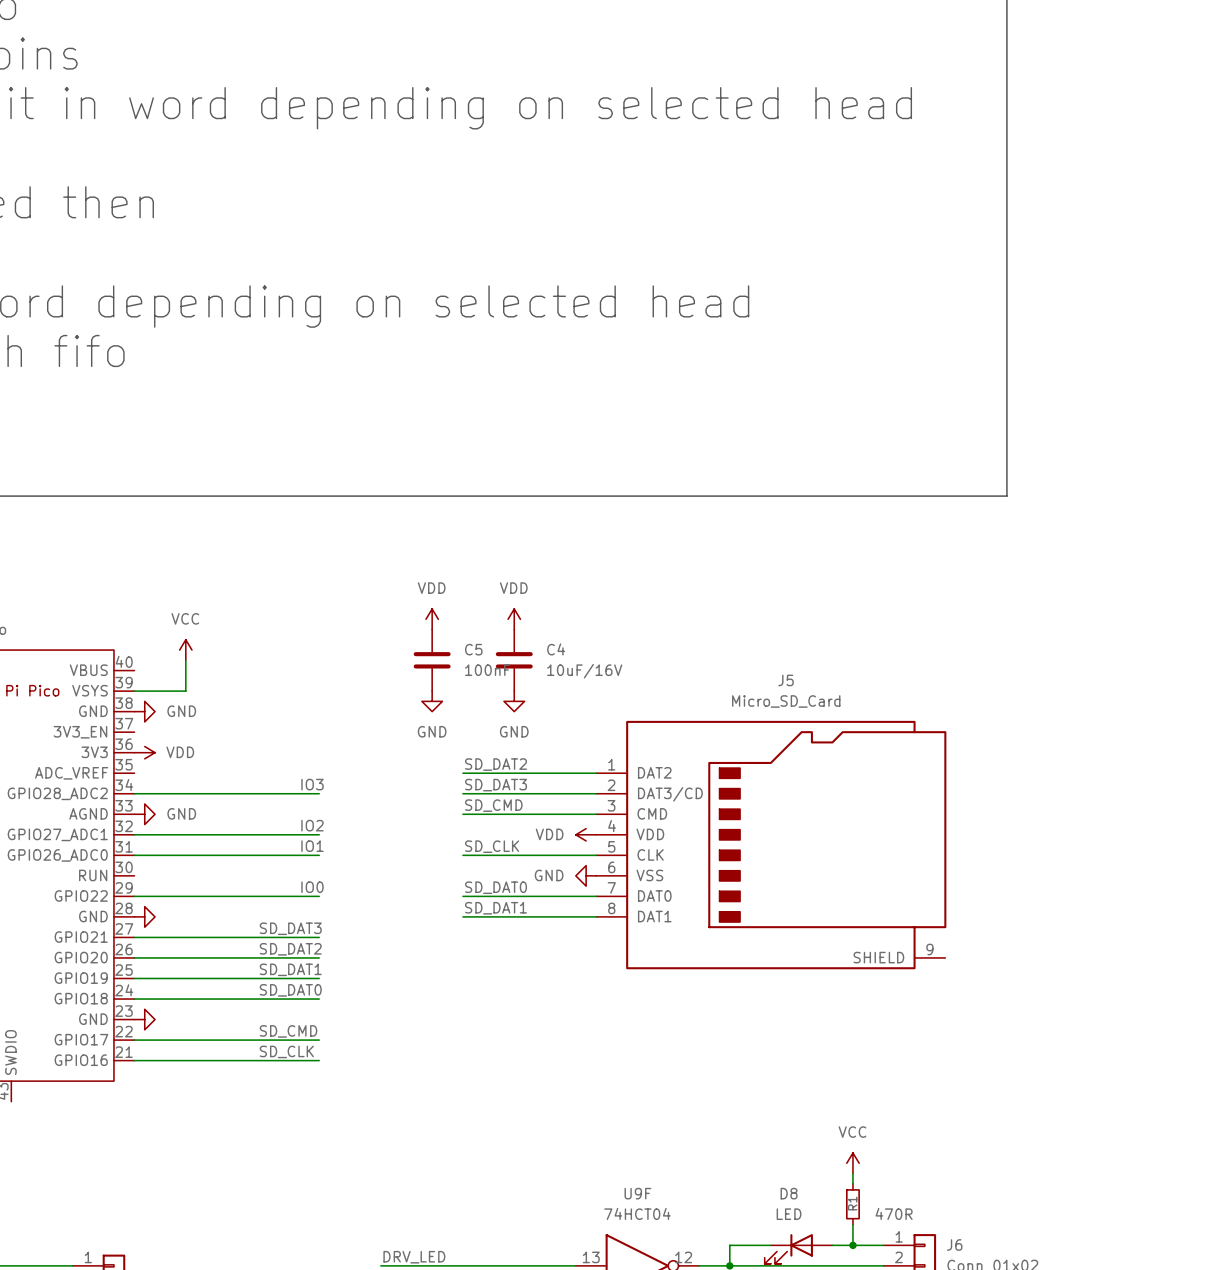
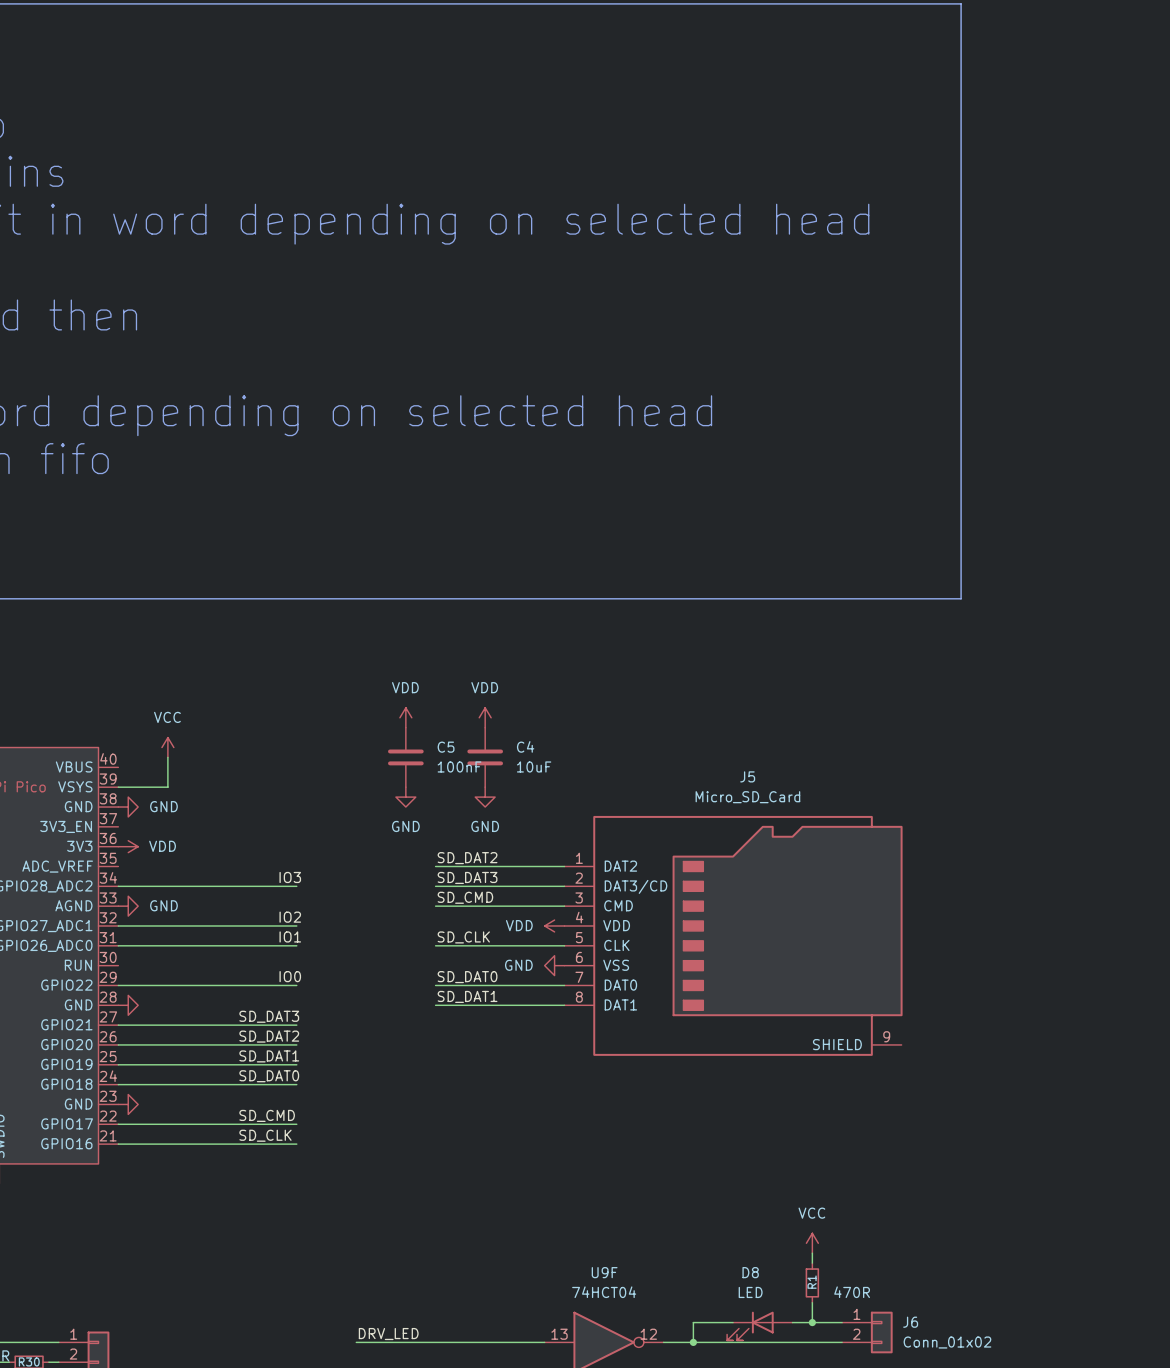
C4 value: 10uF/16V (584, 671) -> 10uF (534, 766)

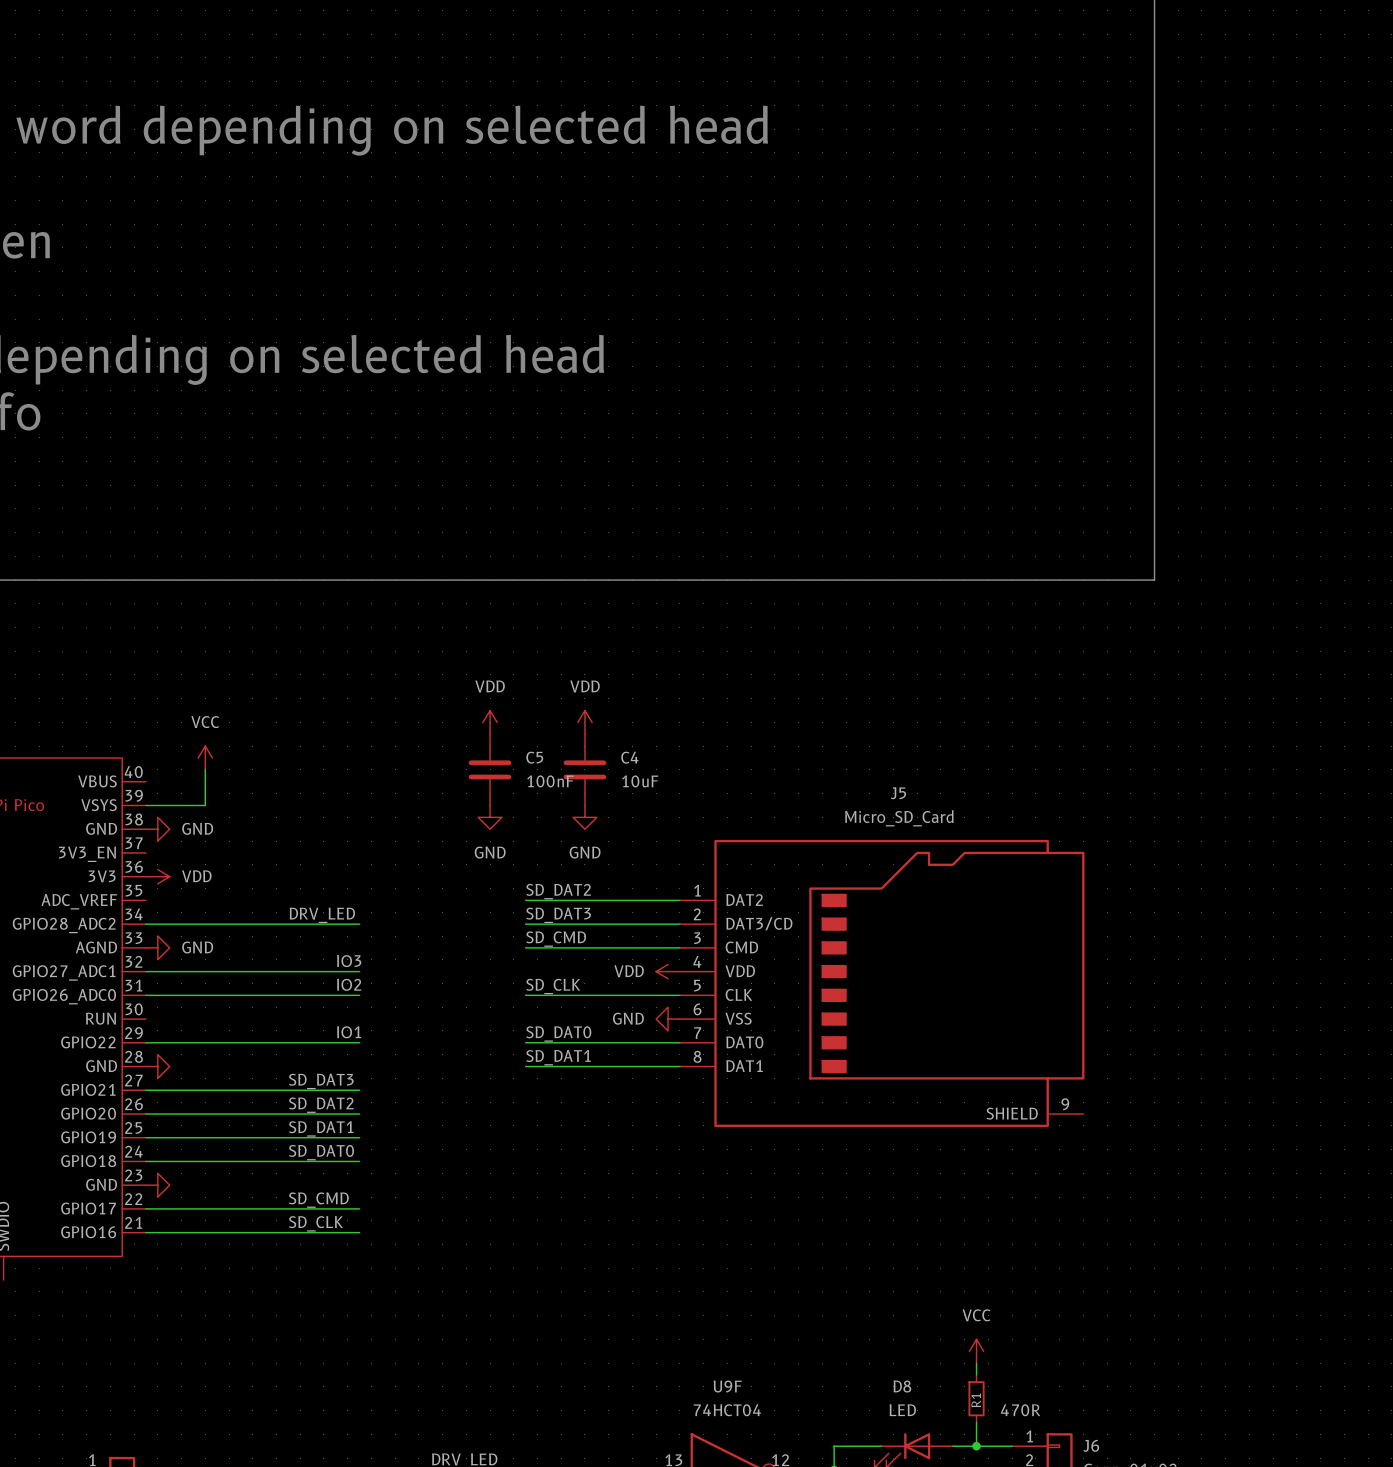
label: none -> DRV_LED (322, 915)
label: IO3 (290, 877) -> none
label: IO2 (290, 917) -> IO3 (349, 961)
label: IO1 (290, 936) -> IO2 (349, 984)
label: IO0 (290, 976) -> IO1 (349, 1032)

